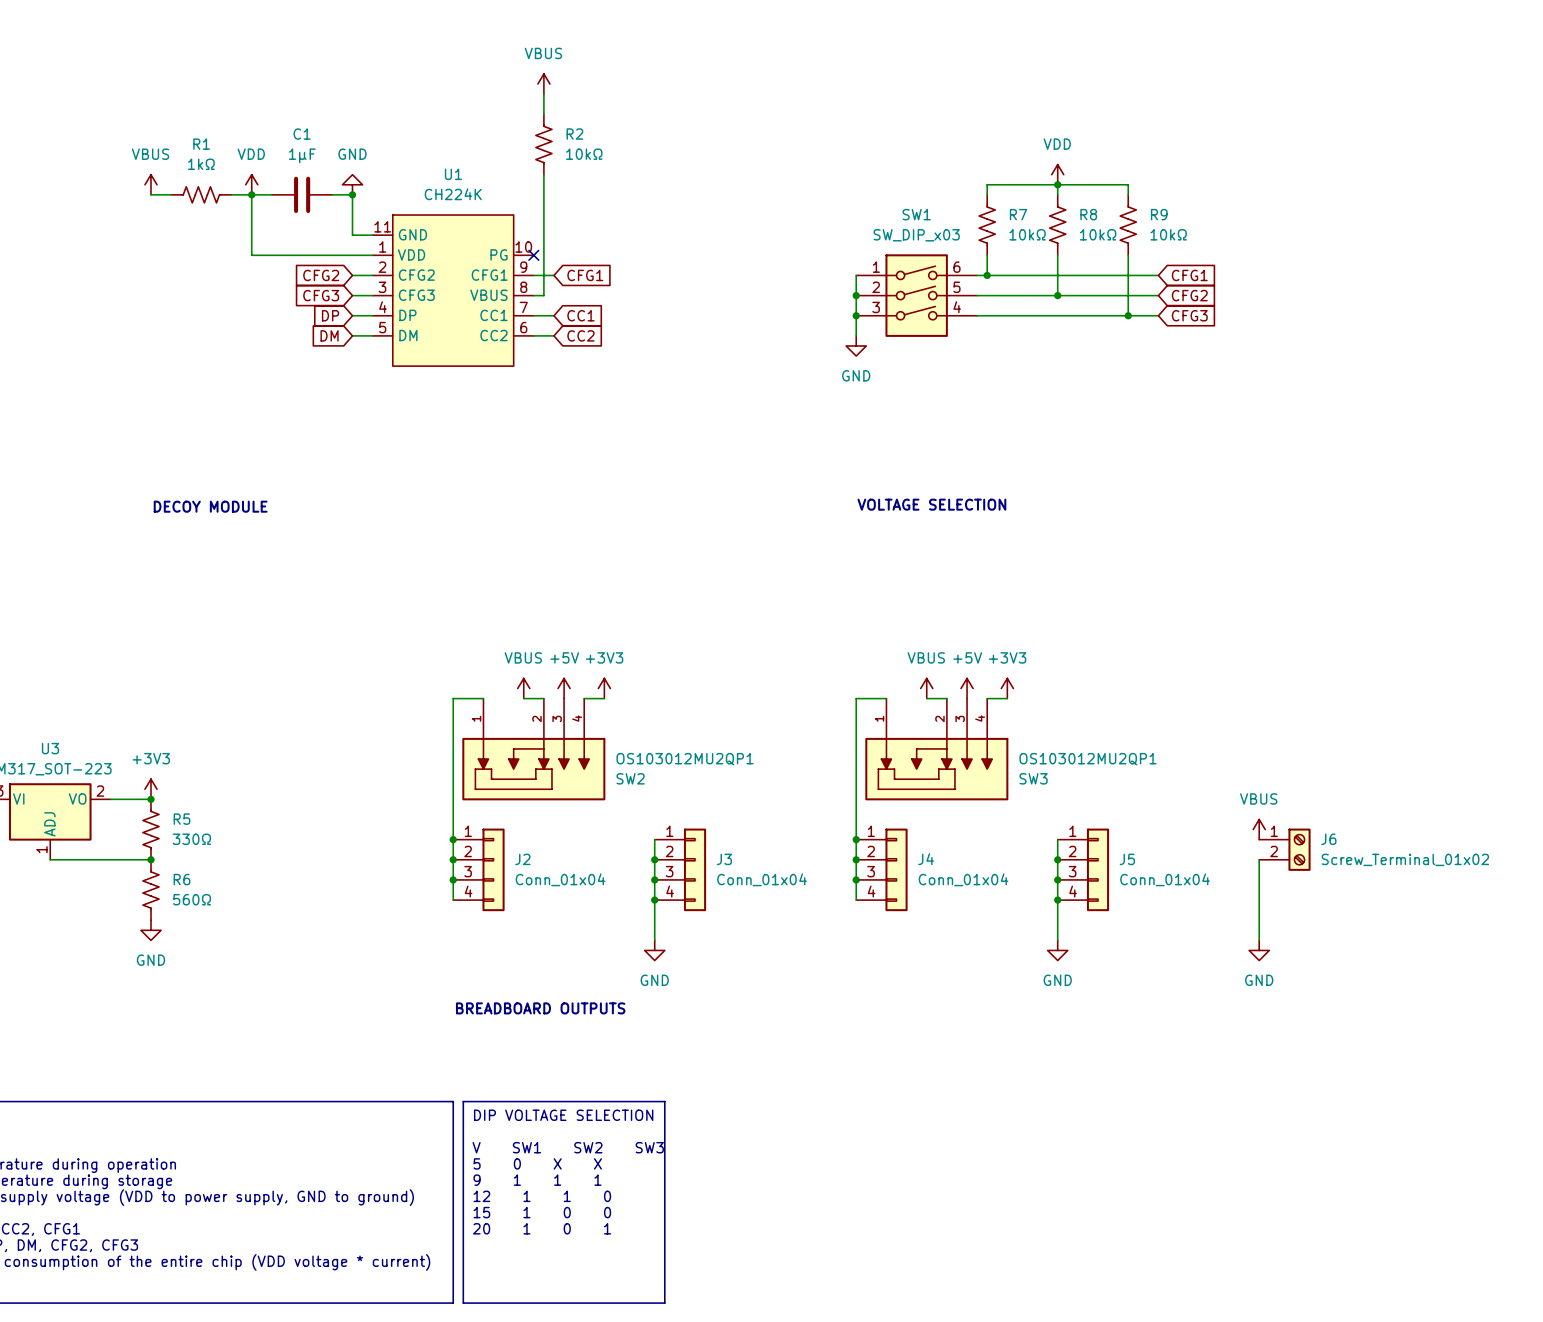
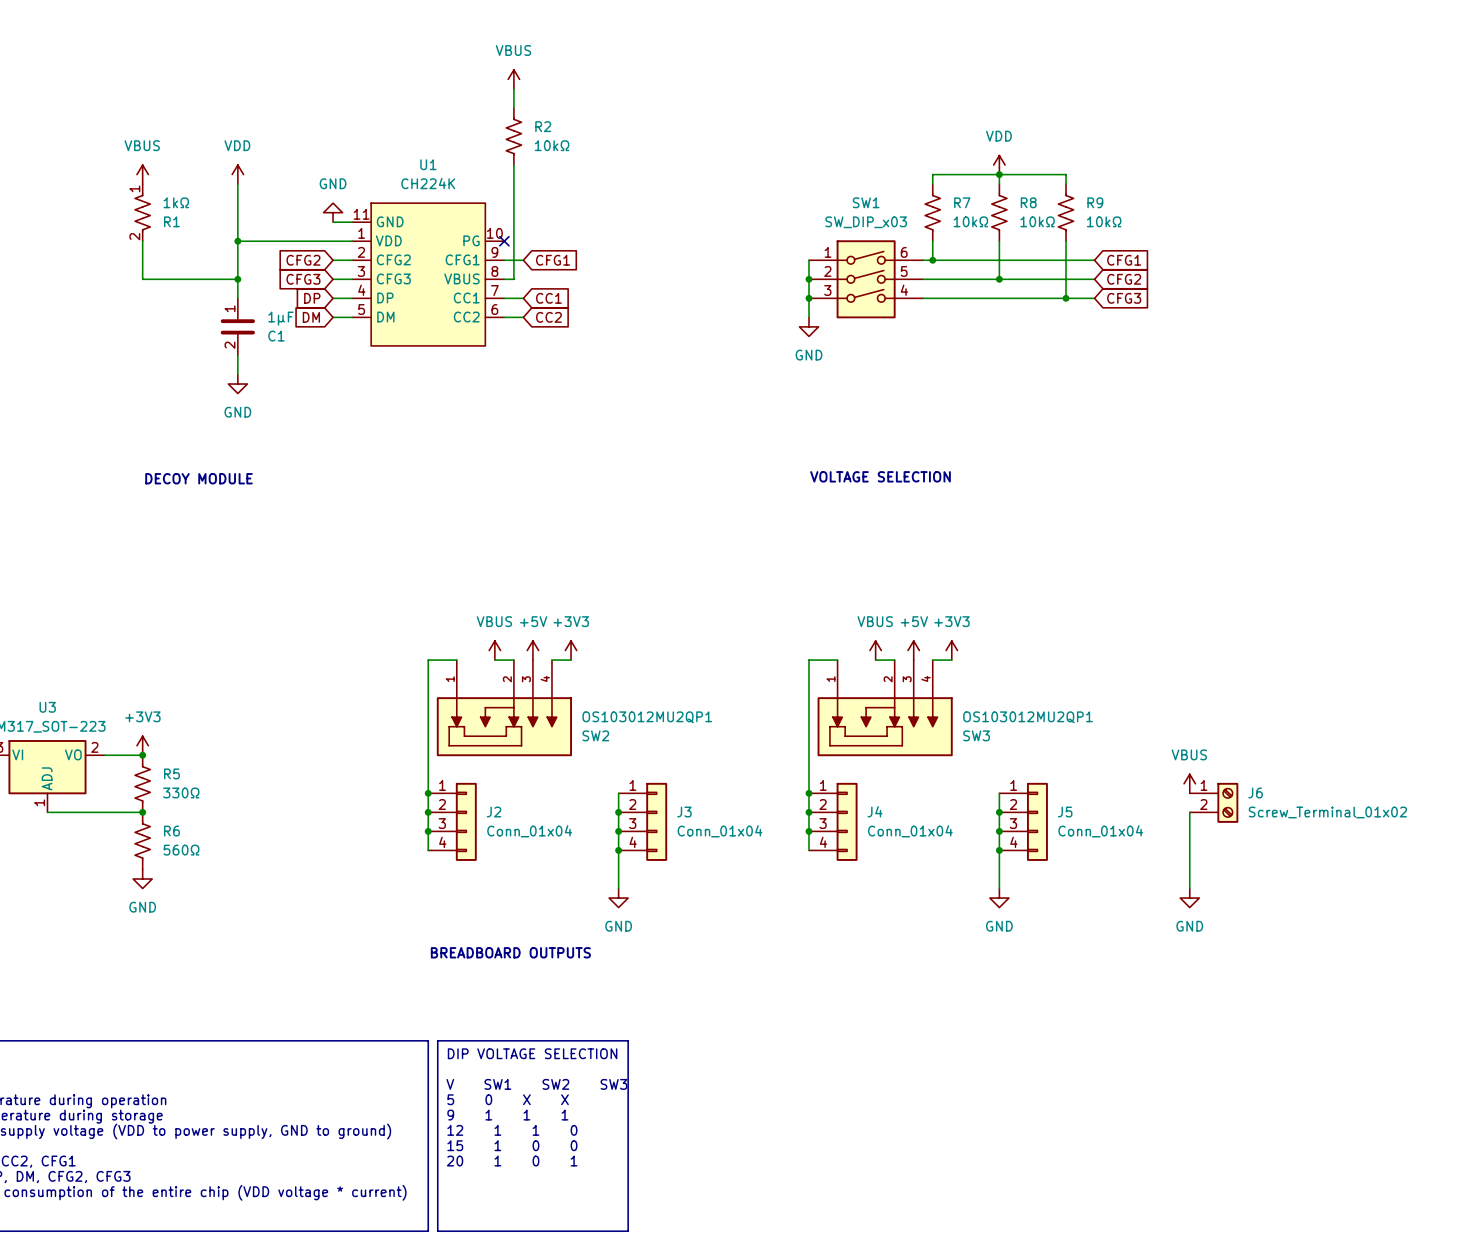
C1 name position: C1 (302, 134) -> C1 (276, 336)
R1 name position: R1 (201, 144) -> R1 (171, 221)
C1 value position: 1μF (302, 155) -> 1μF (280, 318)
R1 value position: 1kΩ (201, 164) -> 1kΩ (176, 202)
C1 symbol: [271, 176, 333, 213] -> [220, 298, 255, 356]
power symbol position: GND (352, 184) -> GND (333, 212)
R1 symbol: [171, 186, 232, 203] -> [135, 184, 151, 242]
wire: (150, 194) (171, 194) -> none
wire: (231, 194) (271, 194) -> none
junction: (251, 194) -> none
wire: (332, 194) (352, 194) (352, 235) -> none
junction: (352, 194) -> none
wire: none -> (142, 241) (142, 279) (237, 279)
wire: none -> (237, 241) (237, 298)
junction: none -> (237, 241)
junction: none -> (237, 279)
wire: none -> (237, 355) (237, 374)
power symbol: none -> GND (237, 384)

